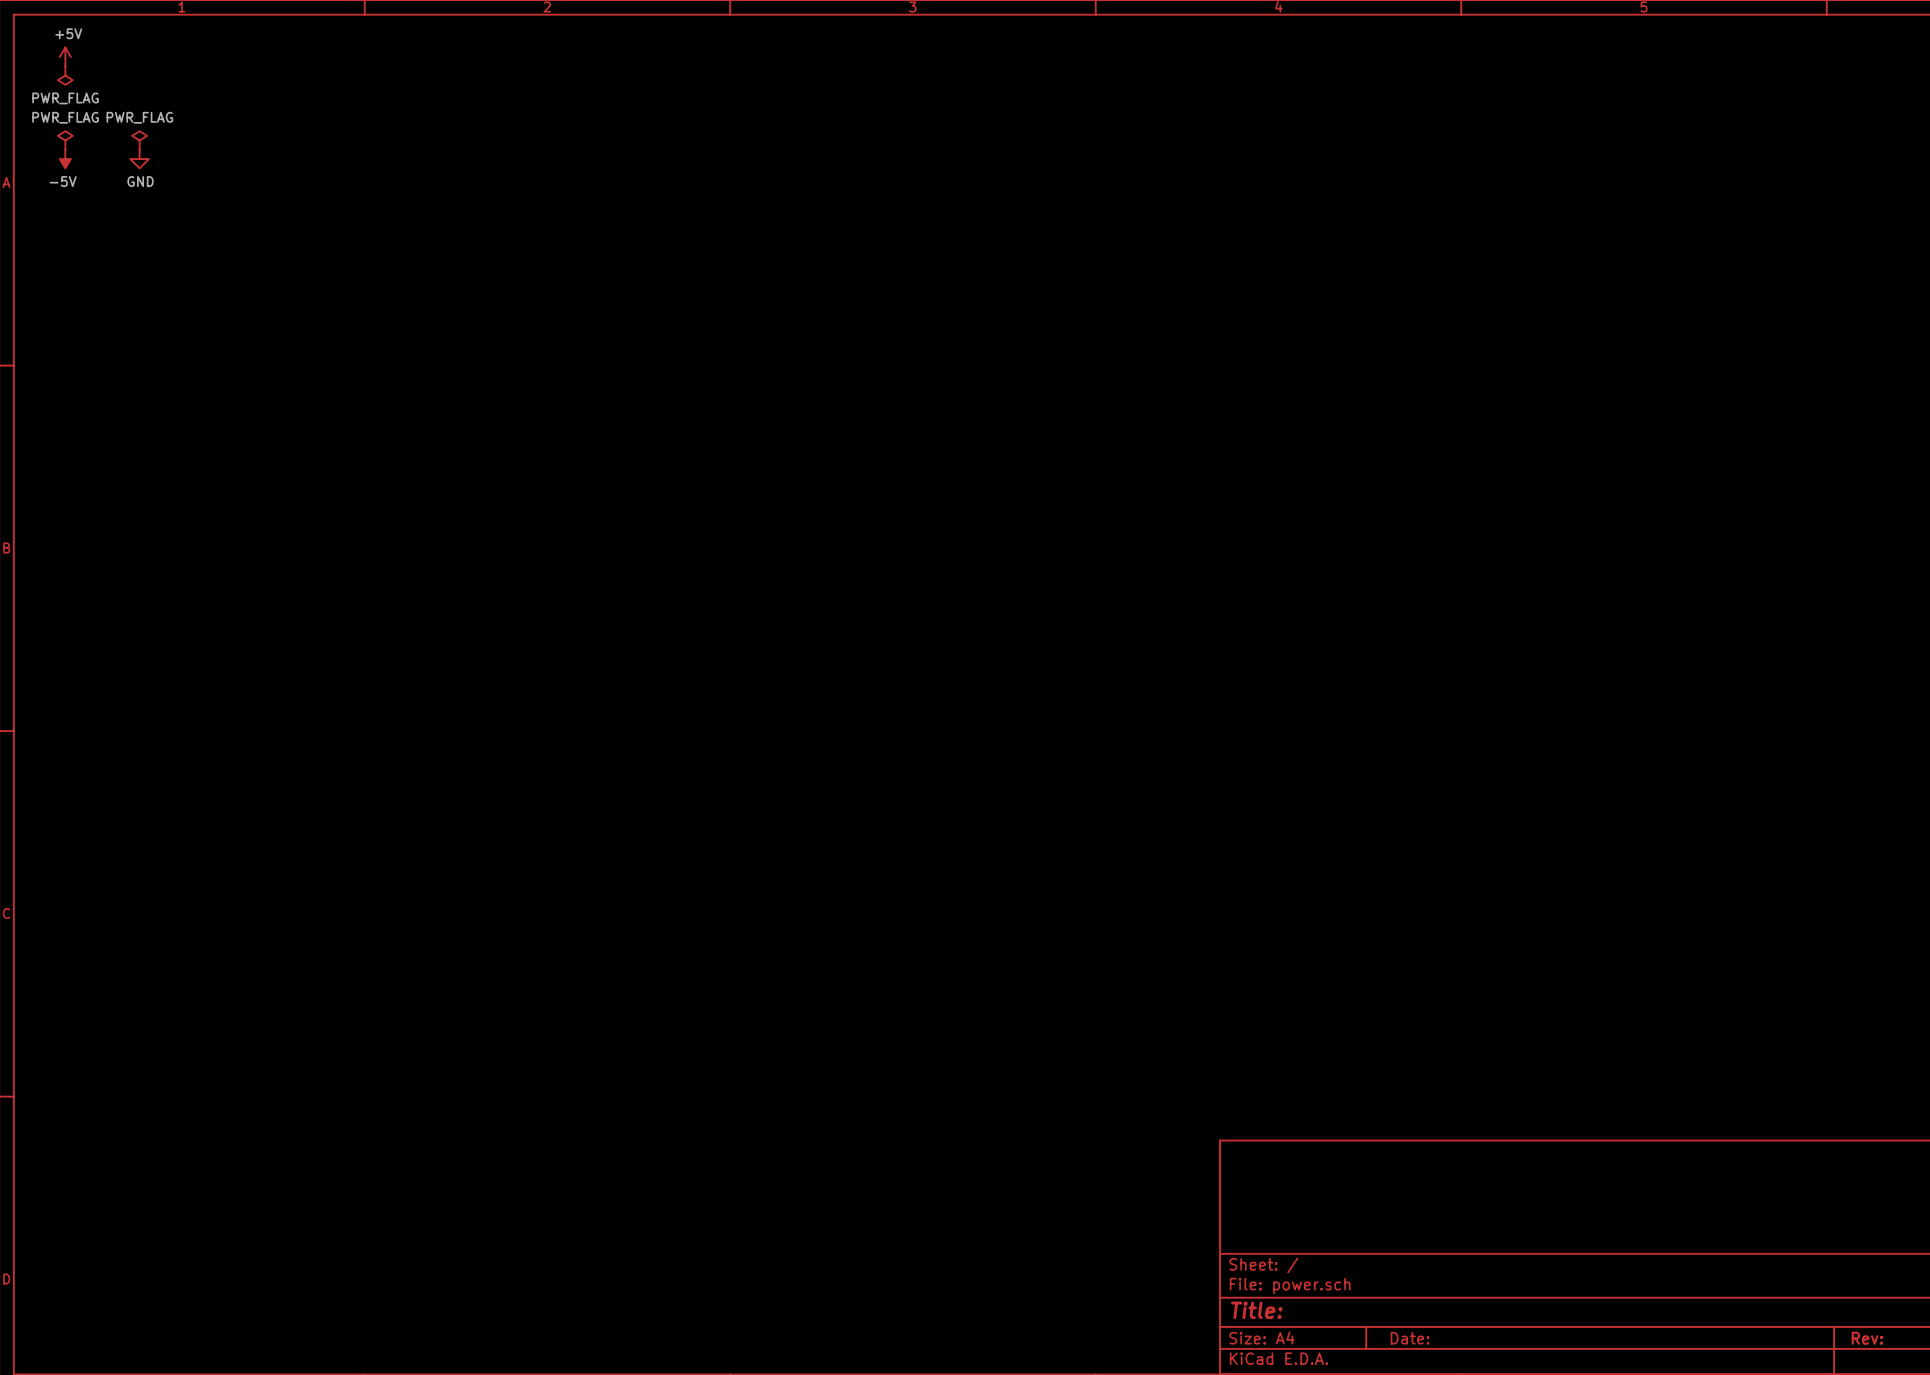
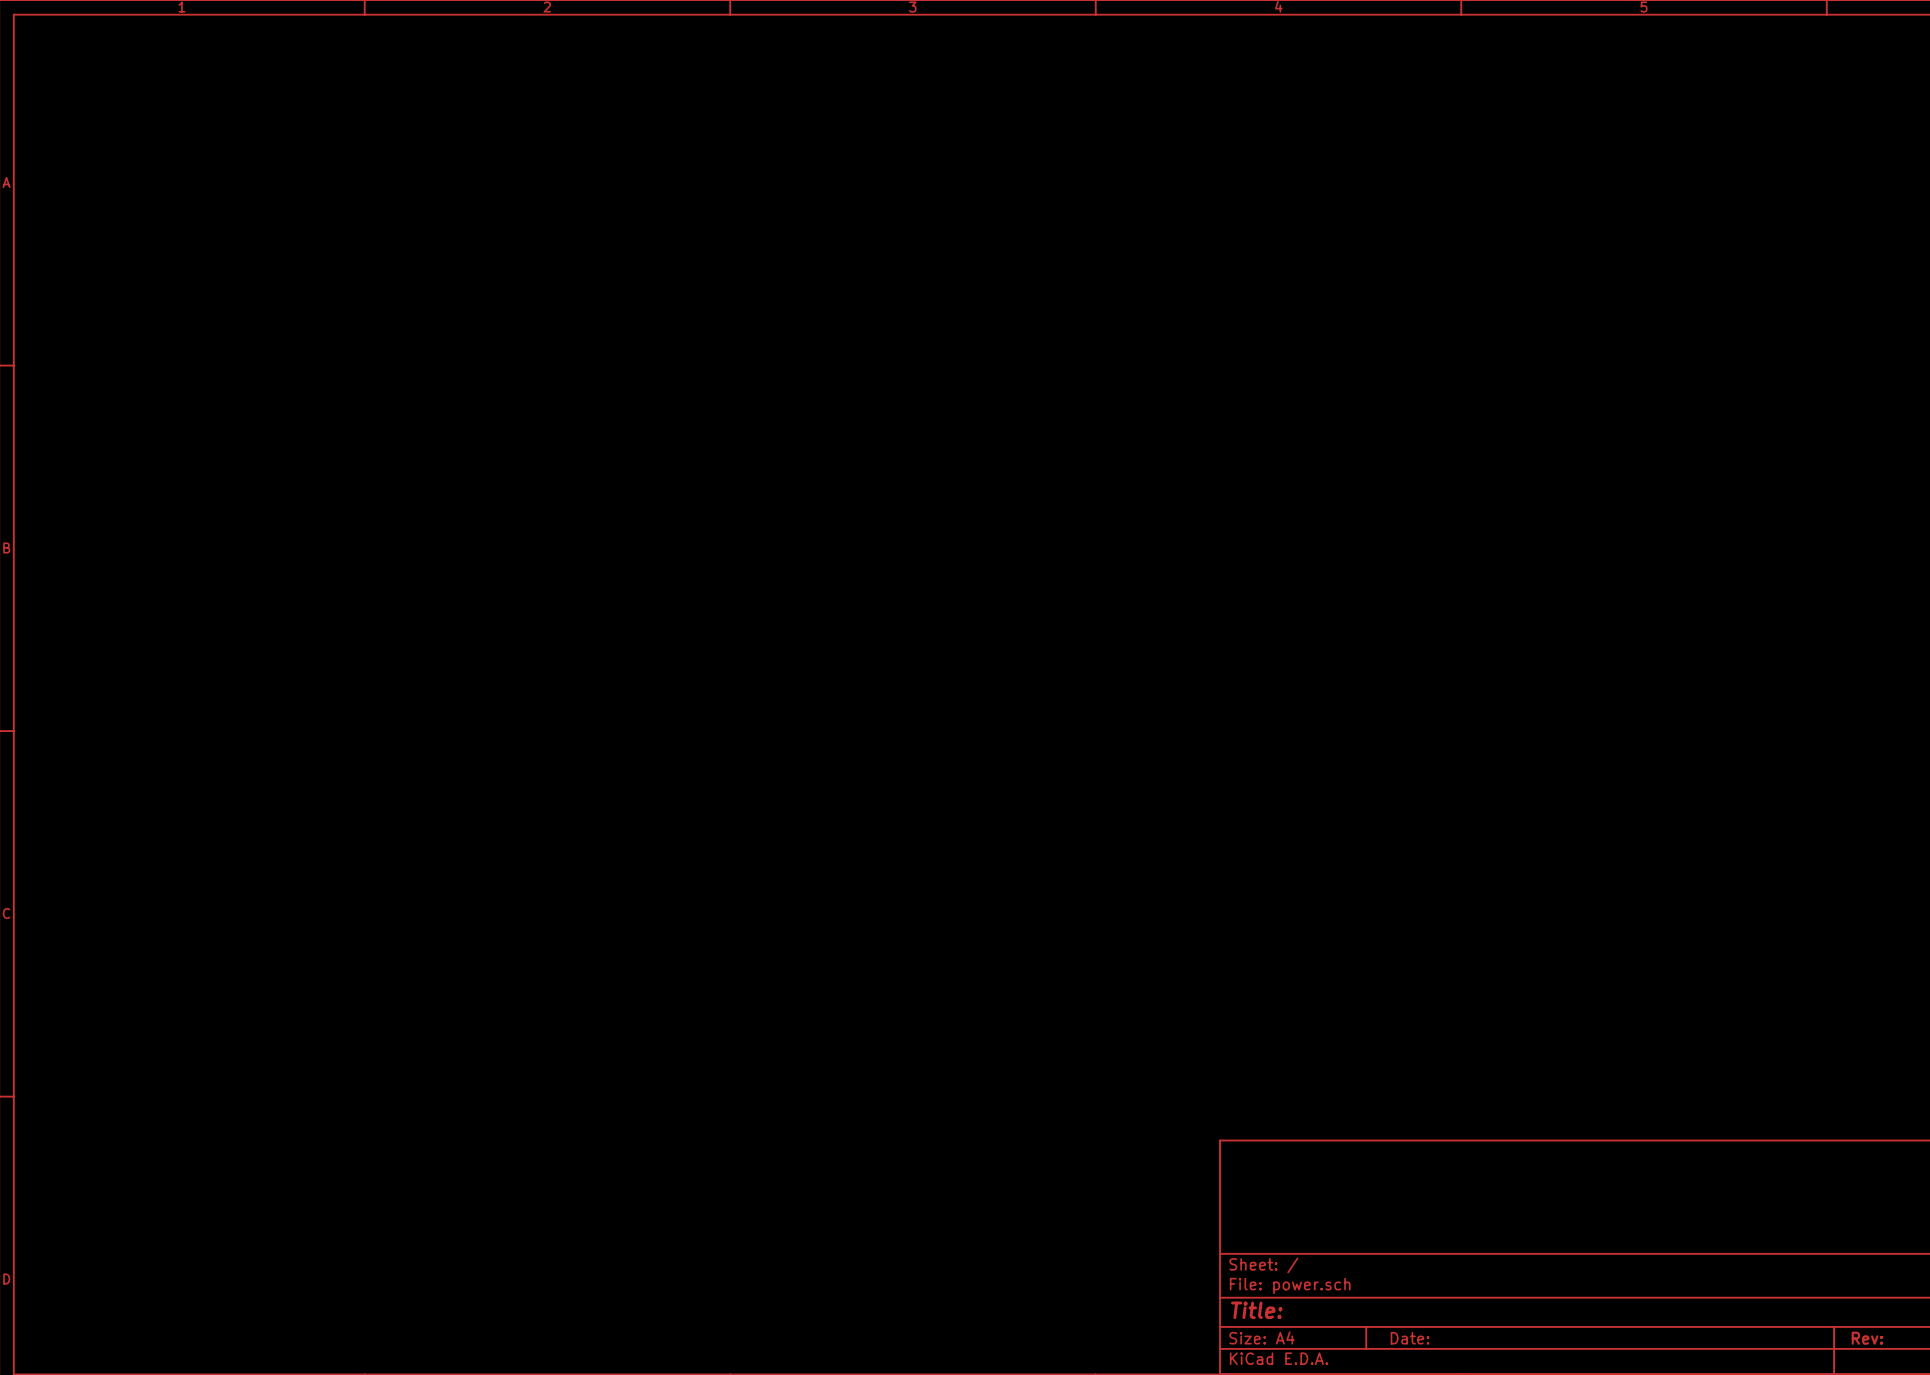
power symbol: +5V (65, 56) -> none
power symbol: PWR_FLAG (65, 75) -> none
power symbol: PWR_FLAG (65, 140) -> none
power symbol: PWR_FLAG (139, 140) -> none
power symbol: -5V (65, 159) -> none
power symbol: GND (139, 159) -> none

